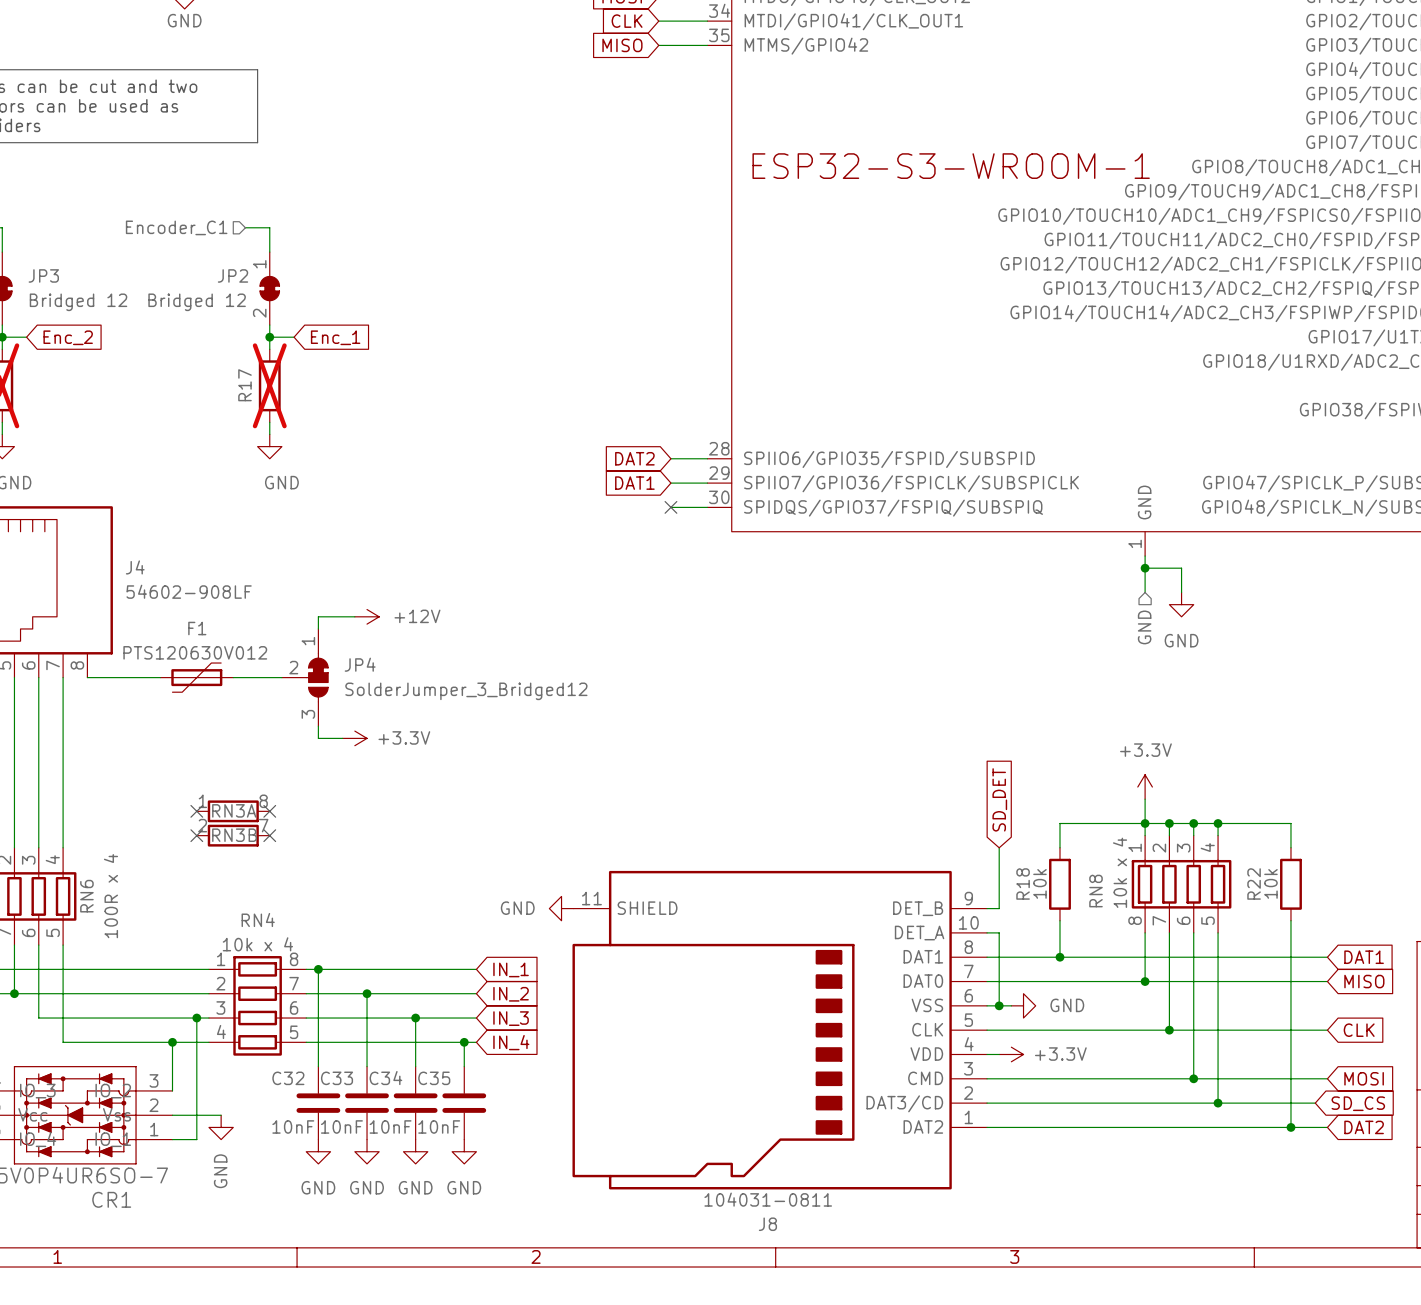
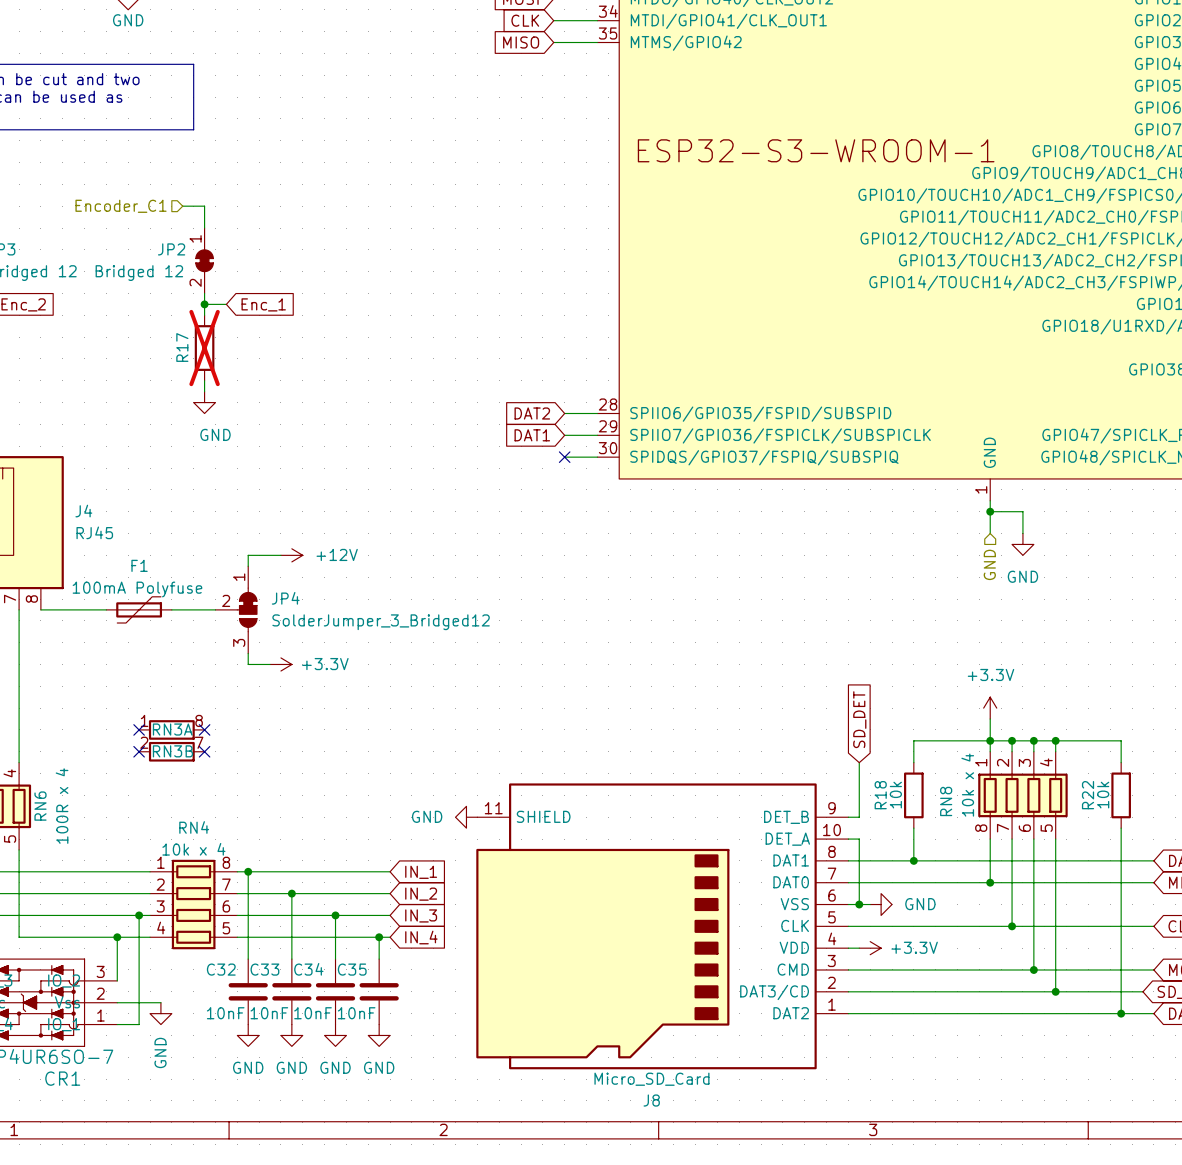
J4 value: 54602-908LF (189, 591) -> RJ45 (94, 532)
F1 value: PTS120630V012 (195, 652) -> 100mA Polyfuse (137, 589)
J8 value: 104031-0811 (768, 1199) -> Micro_SD_Card (651, 1079)

